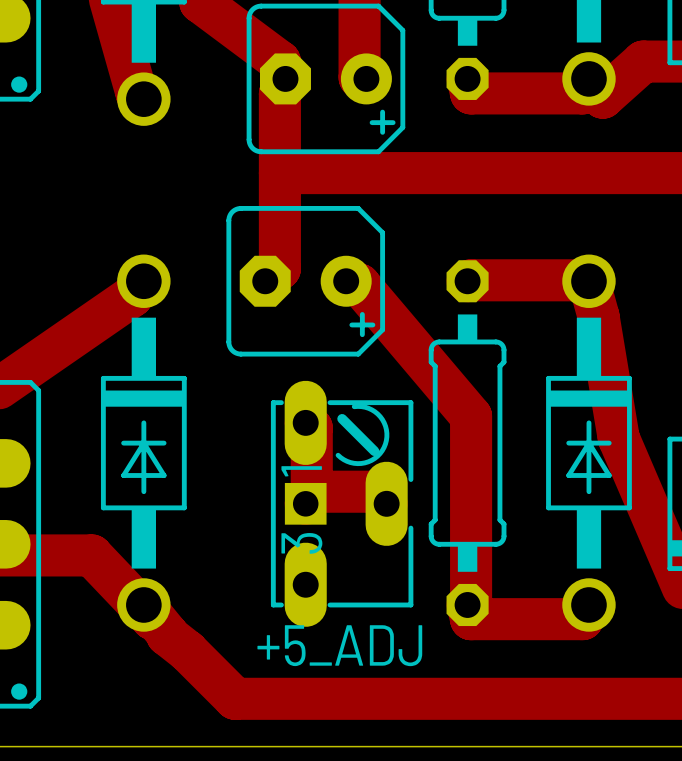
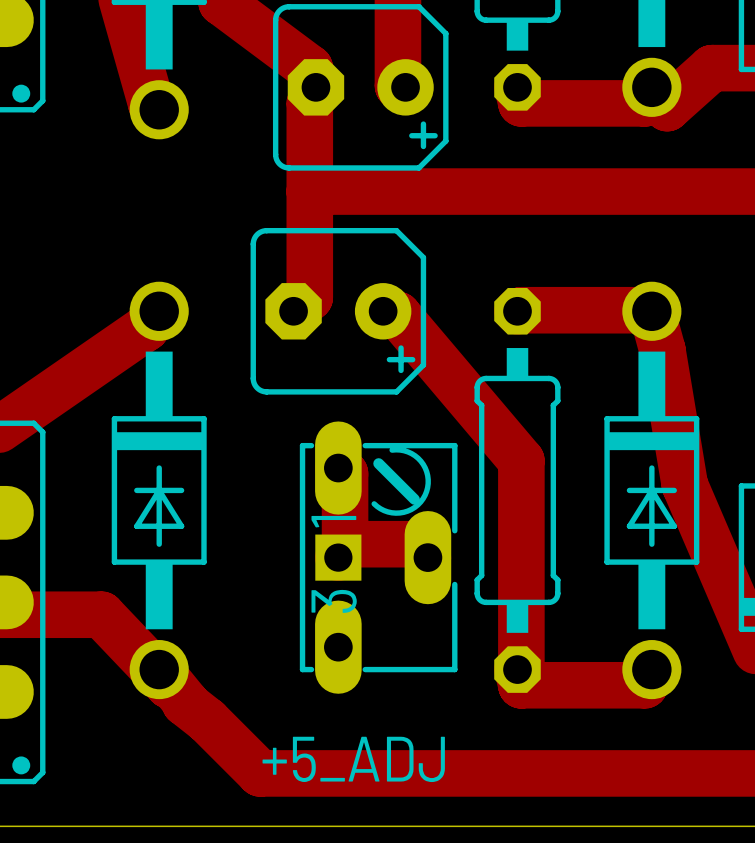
+5_ADJ name position: +5_ADJ (339, 645) -> +5_ADJ (353, 759)

